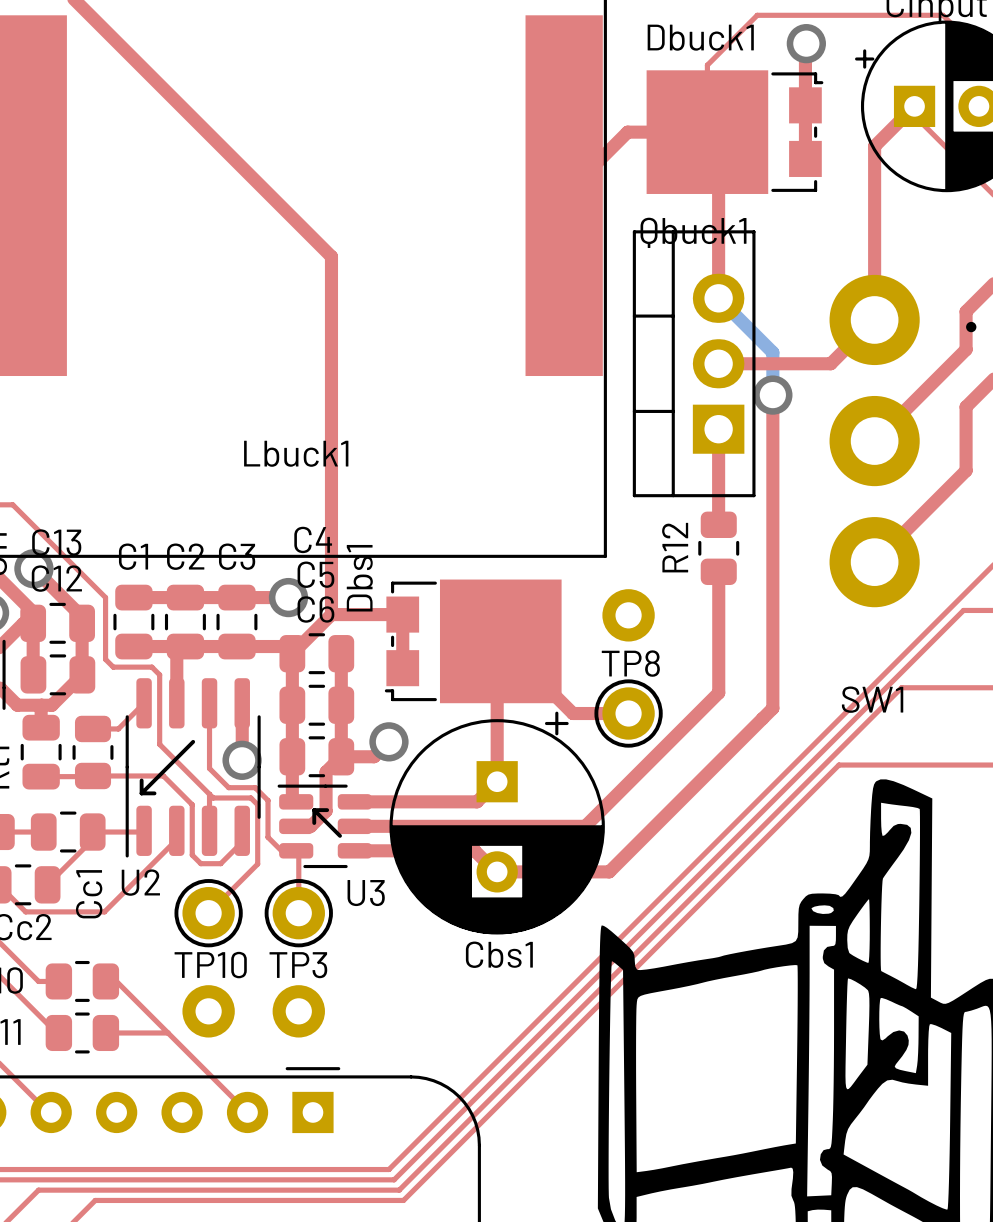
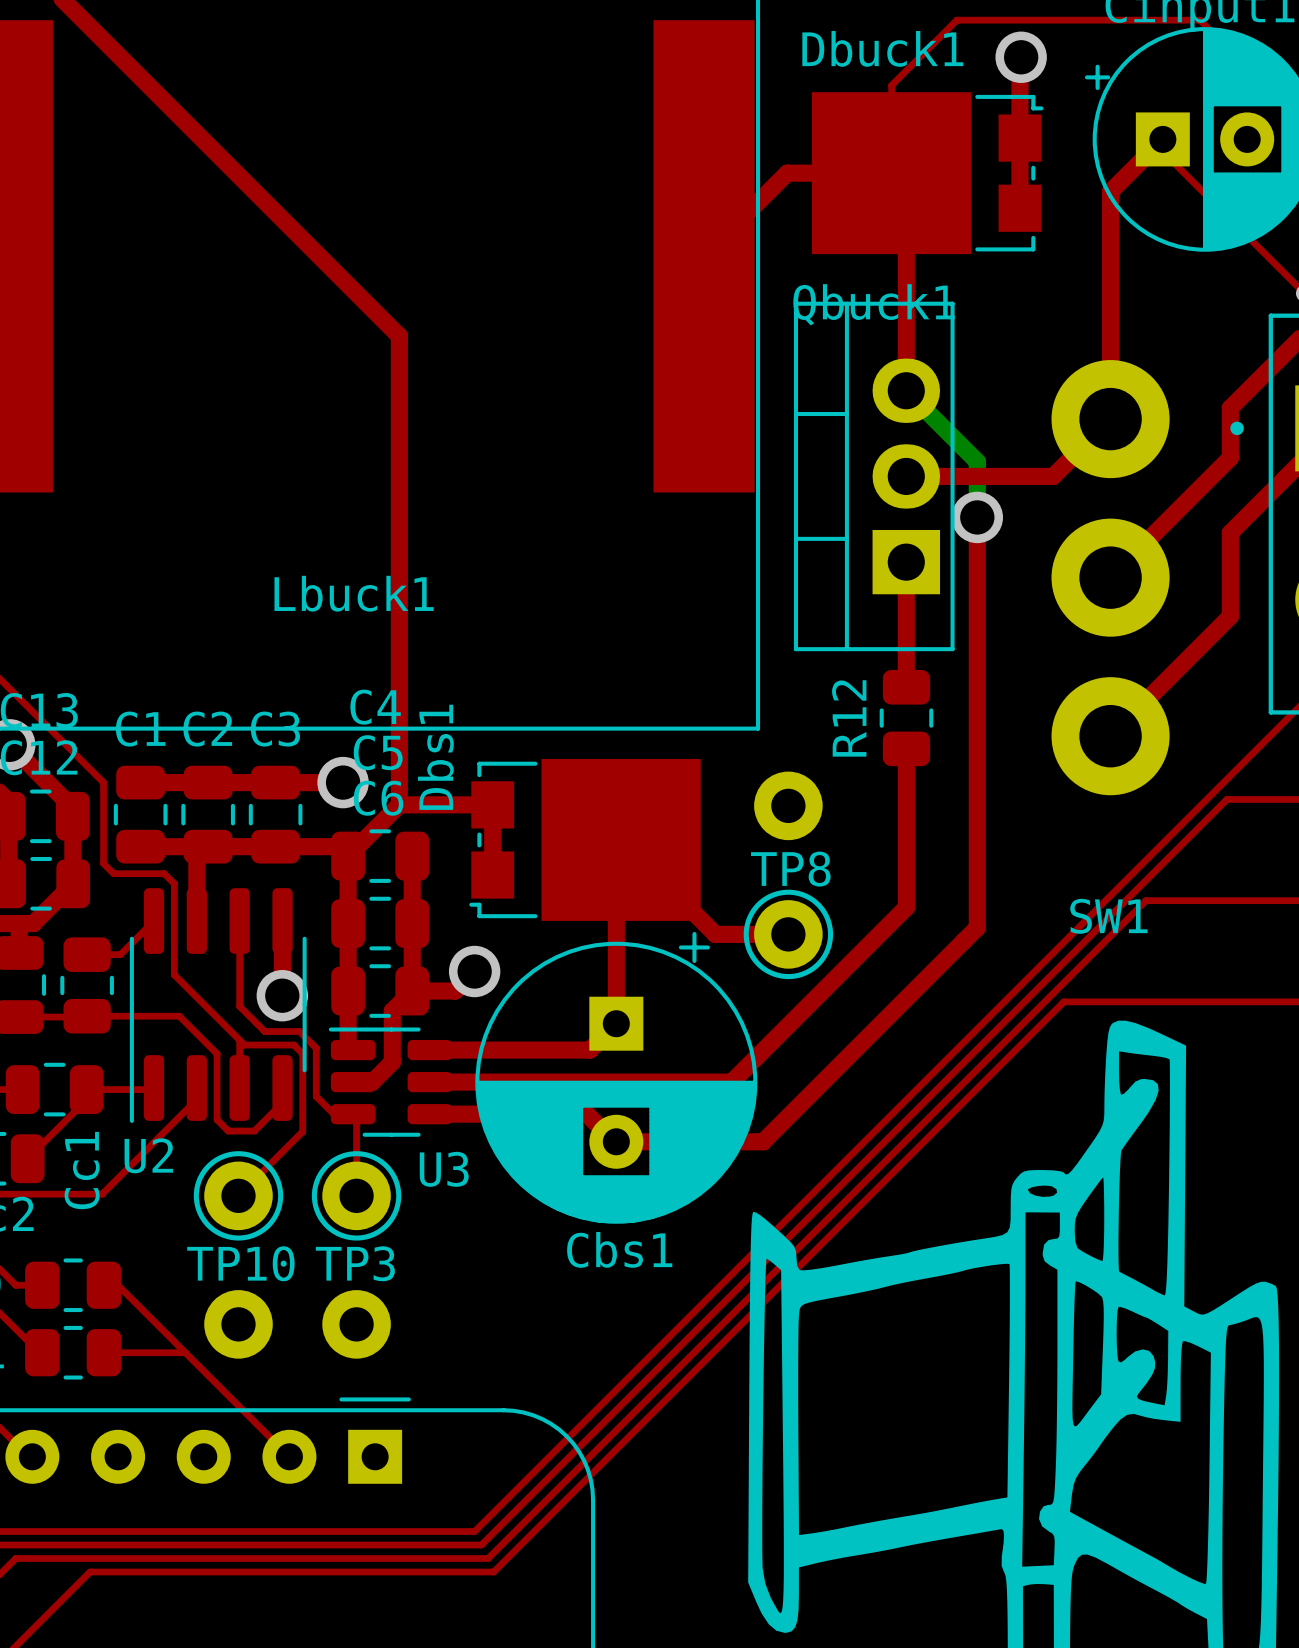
line: (193, 741) (141, 793) -> none
line: (141, 780) (141, 793) -> none
line: (141, 793) (154, 793) -> none
line: (314, 810) (327, 810) -> none
line: (314, 810) (340, 835) -> none
line: (314, 810) (314, 823) -> none

